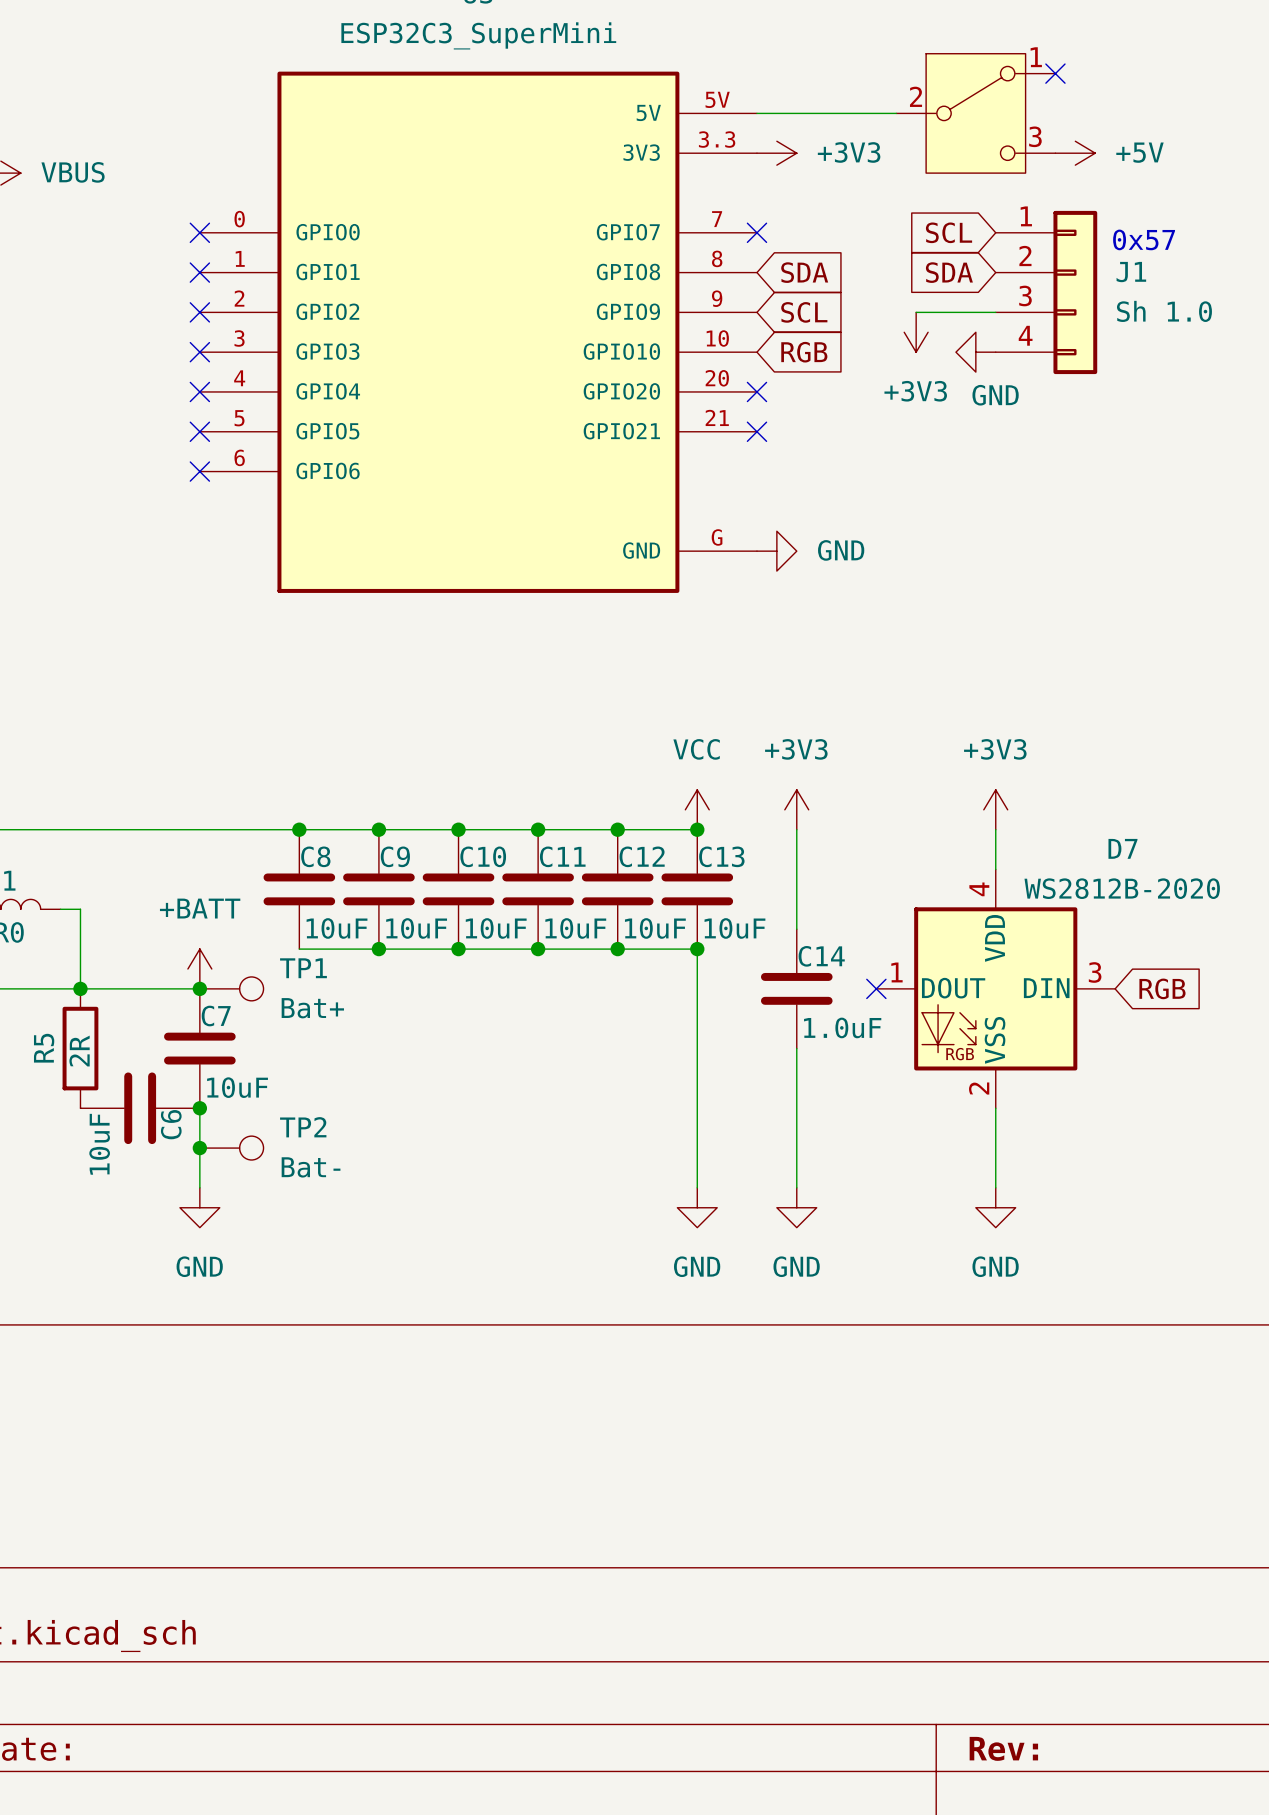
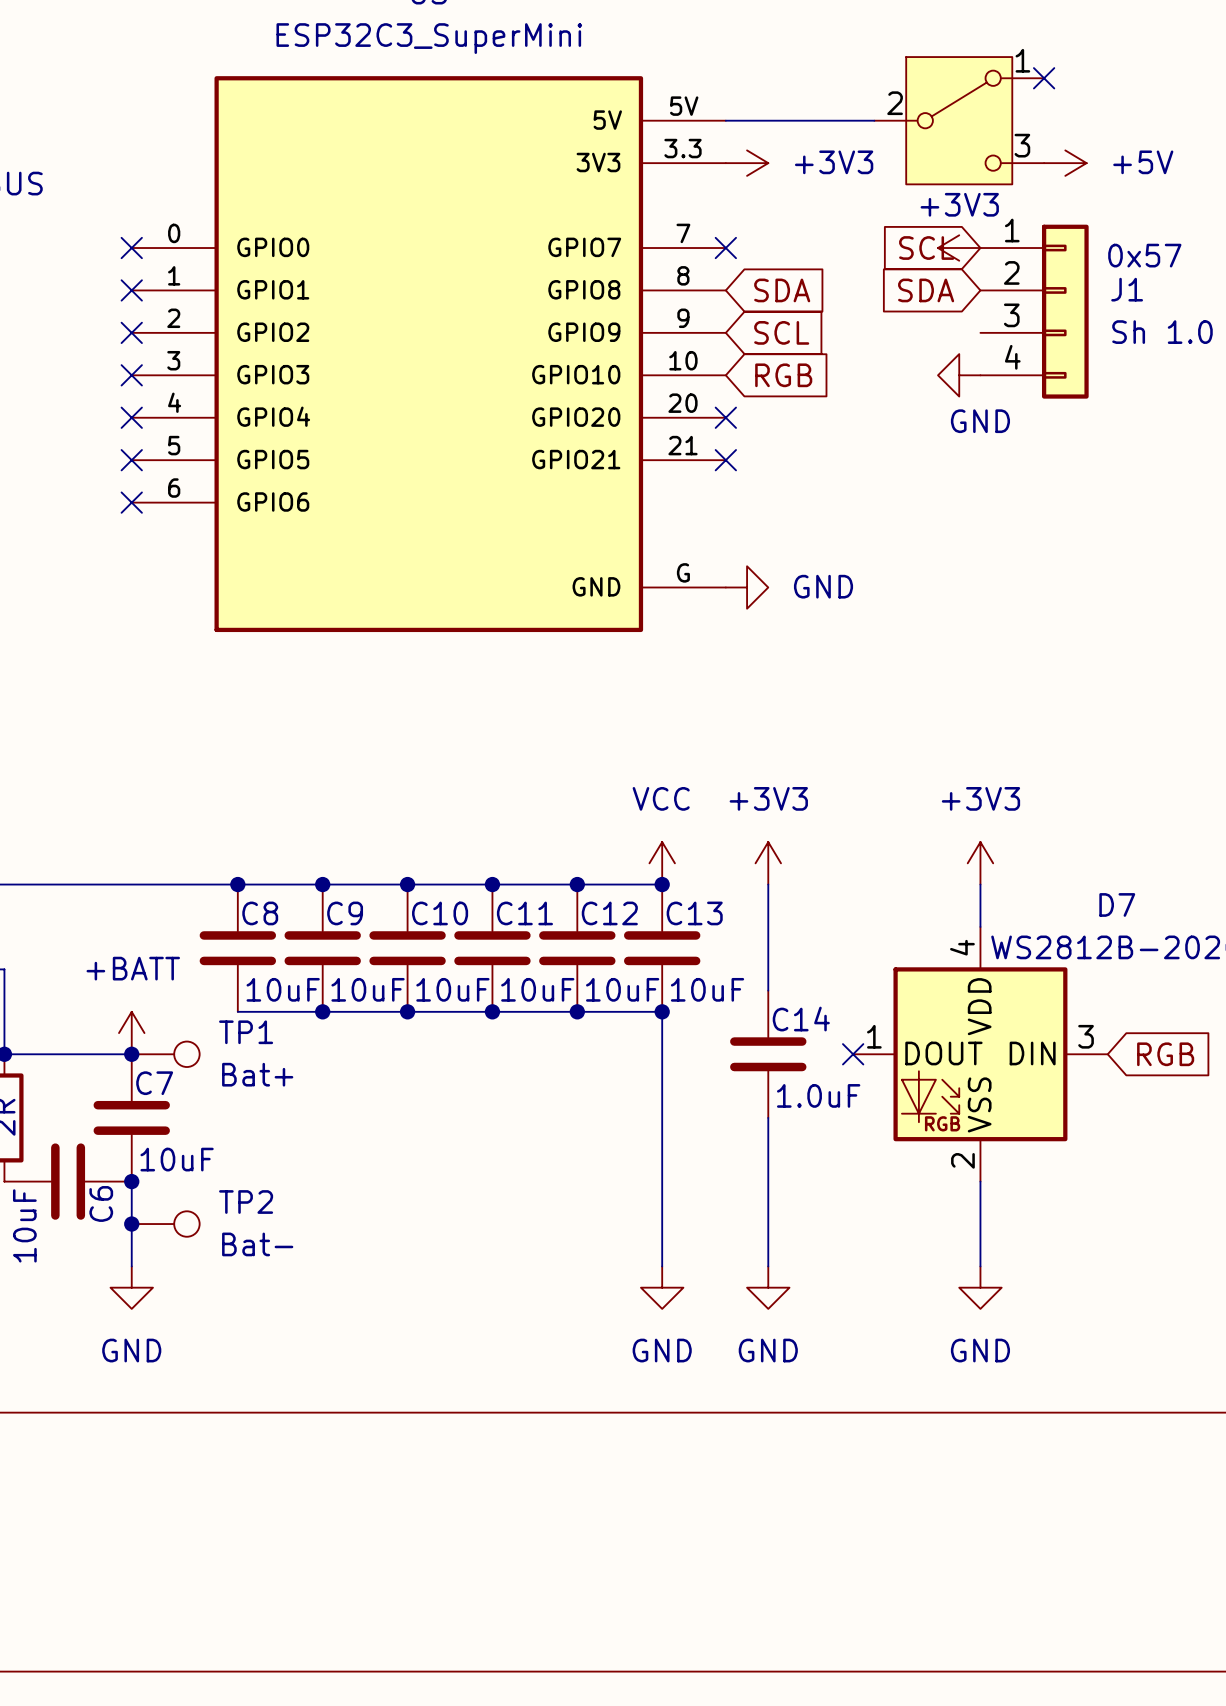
wire: (916, 312) (995, 312) -> none
power symbol rotation: 0° (916, 332) -> 90° clockwise (959, 248)
power symbol position: +3V3 (916, 332) -> +3V3 (959, 248)
power symbol text position: +3V3 (915, 391) -> +3V3 (959, 204)

